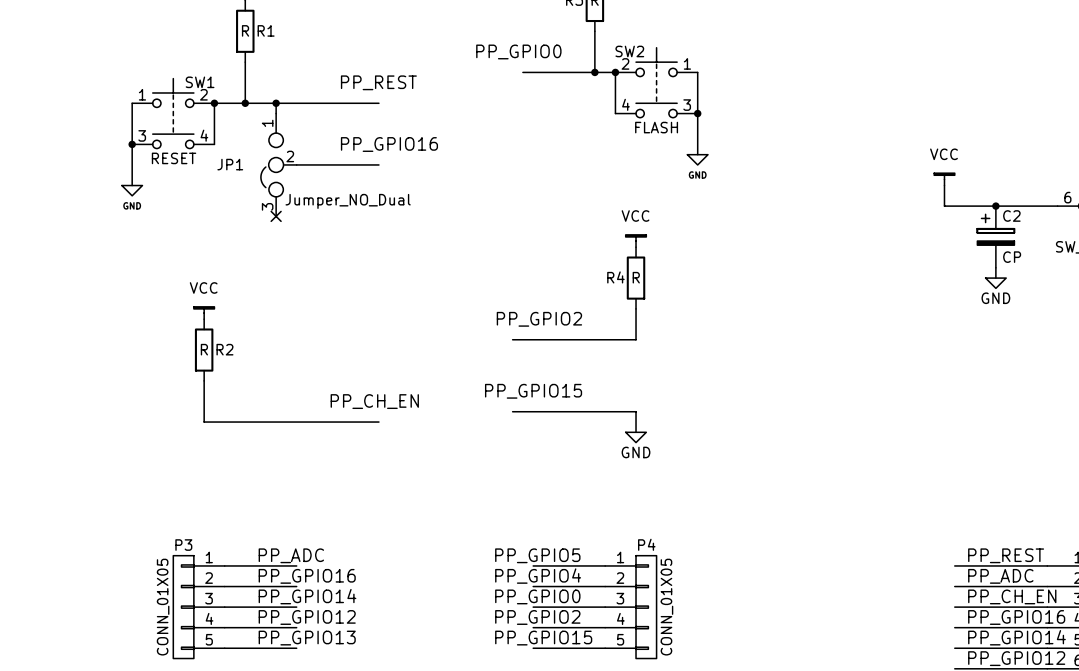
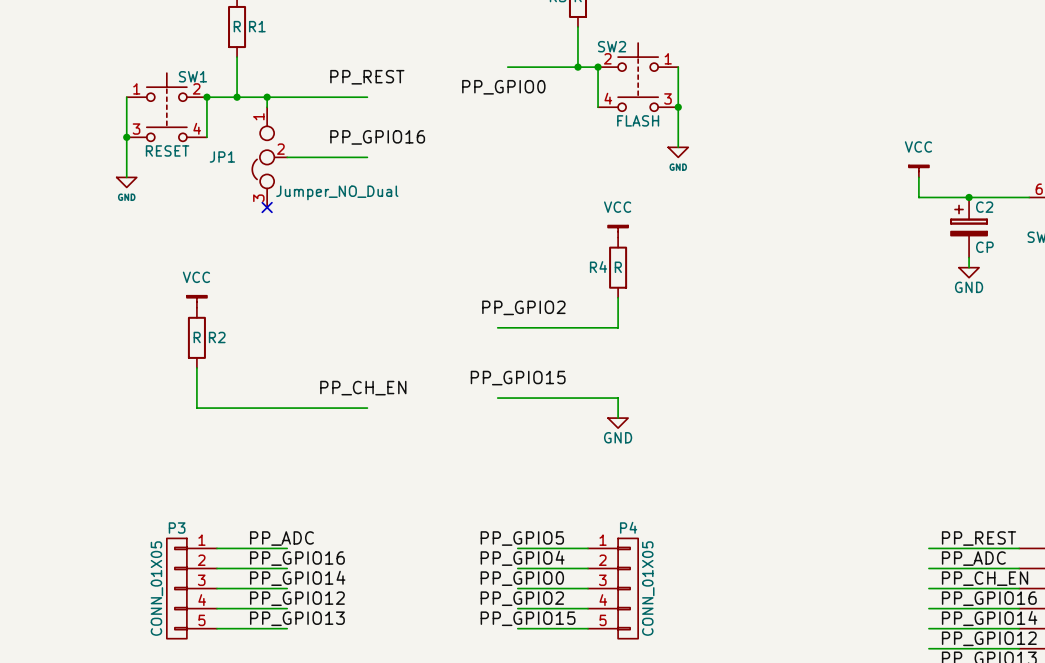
label position: PP_GPIO0 (518, 51) -> PP_GPIO0 (503, 87)

